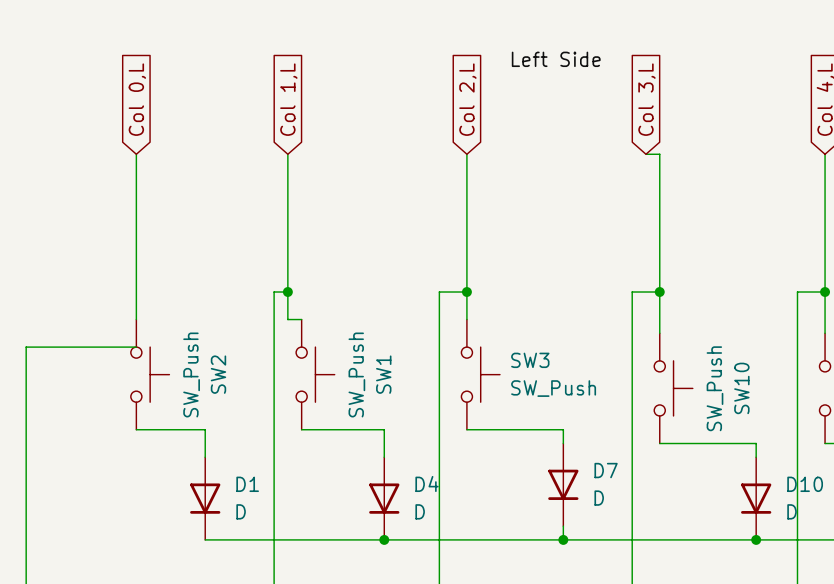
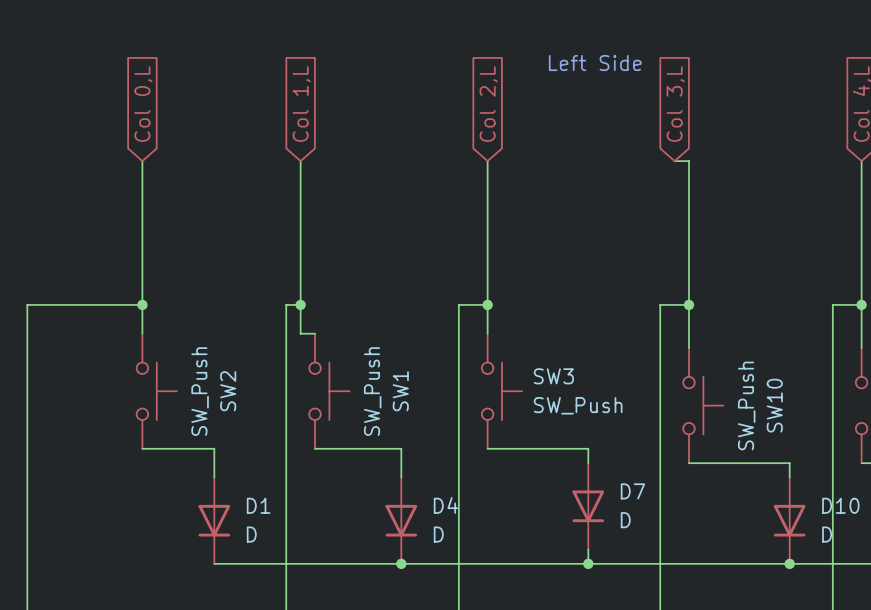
label: Left Side (556, 59) -> none
text: none -> Left Side (595, 63)
junction: none -> (142, 304)
wire: (26, 347) (136, 347) -> (27, 362) (27, 304) (142, 304)

